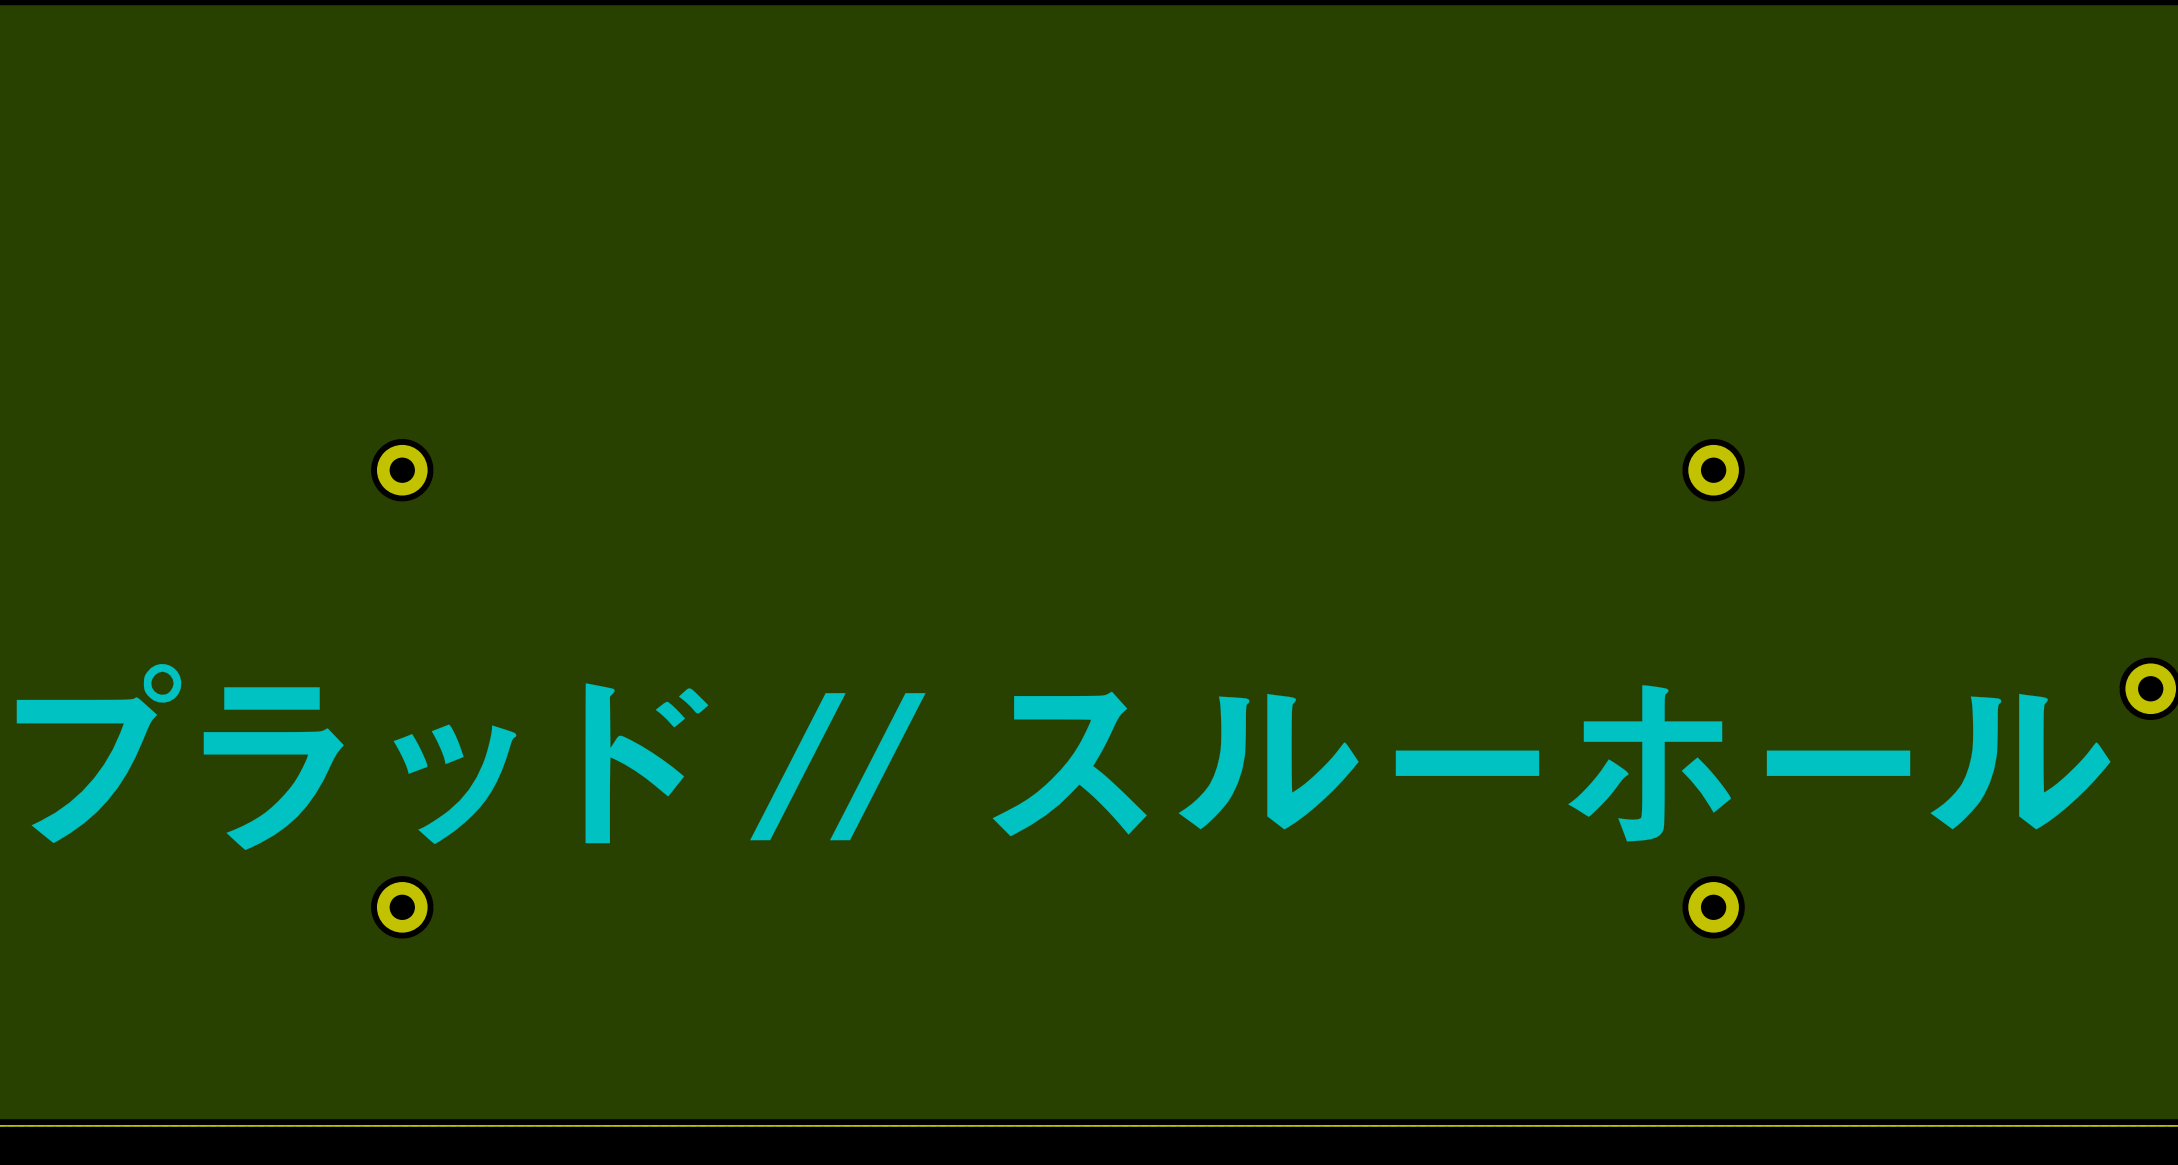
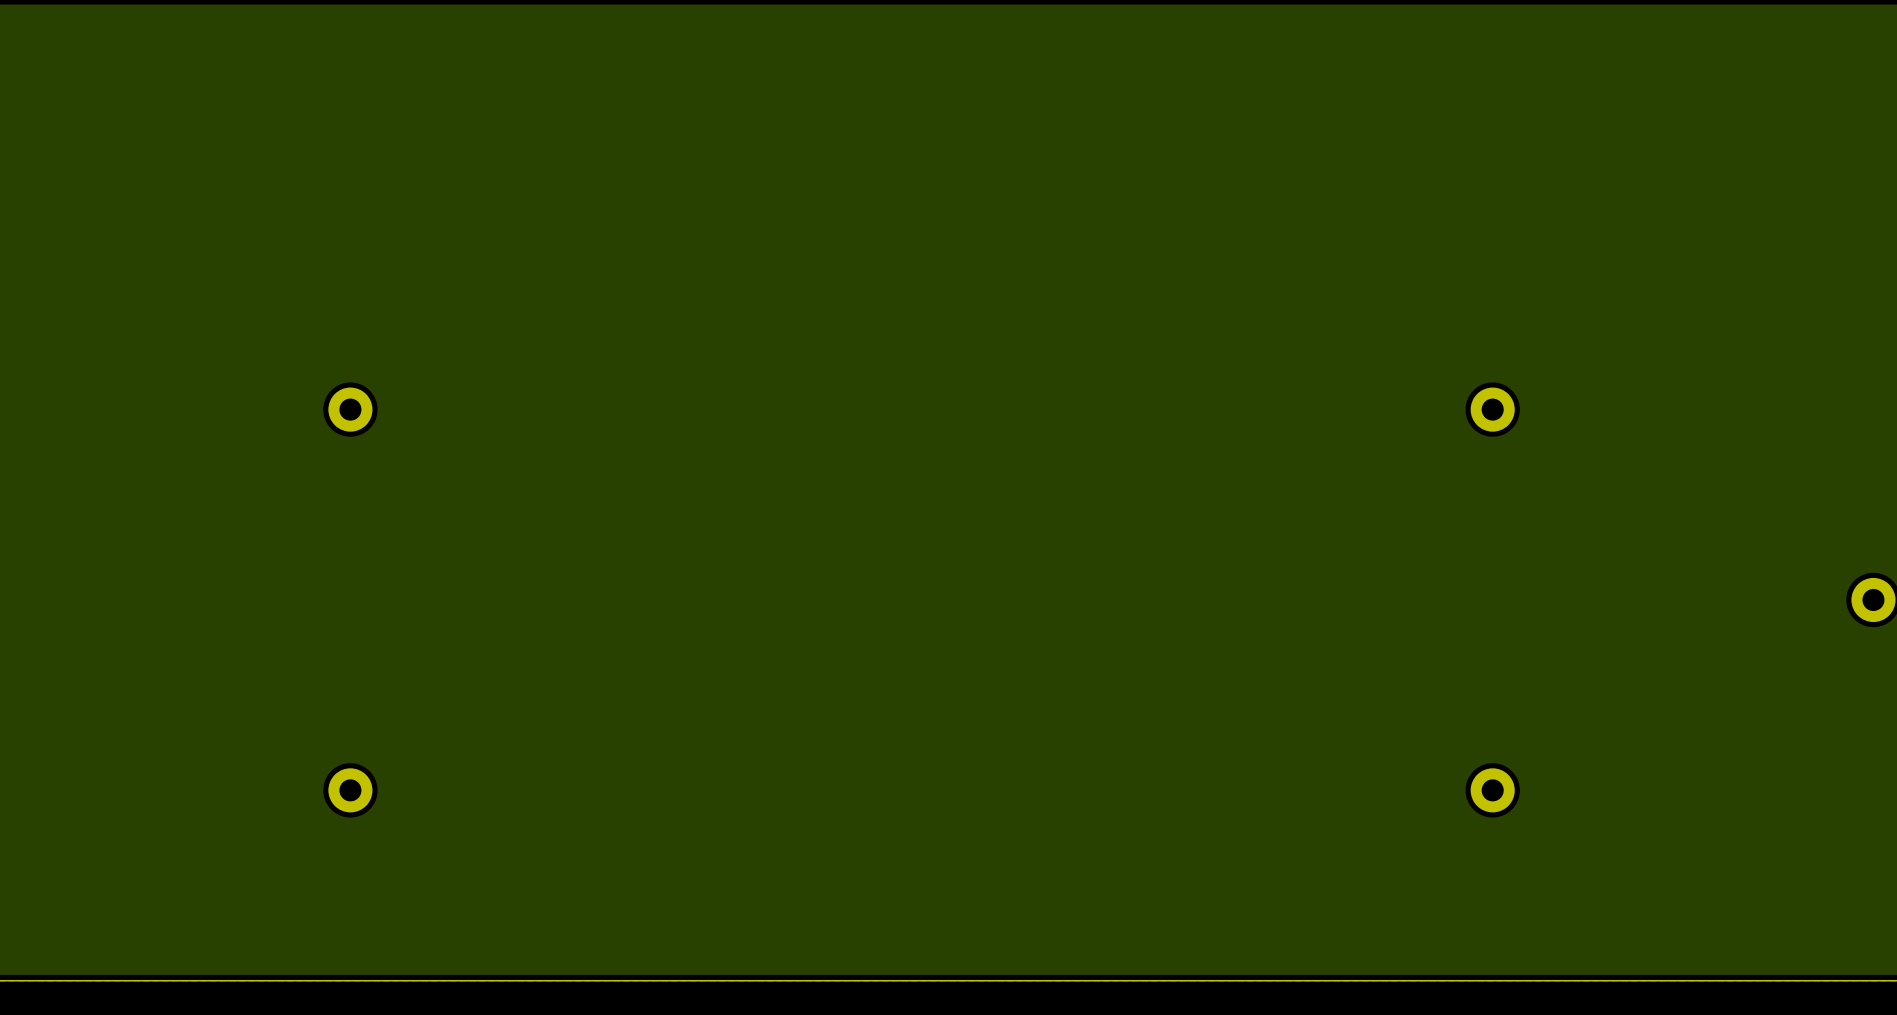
drawing: [16, 664, 2111, 850] -> none

